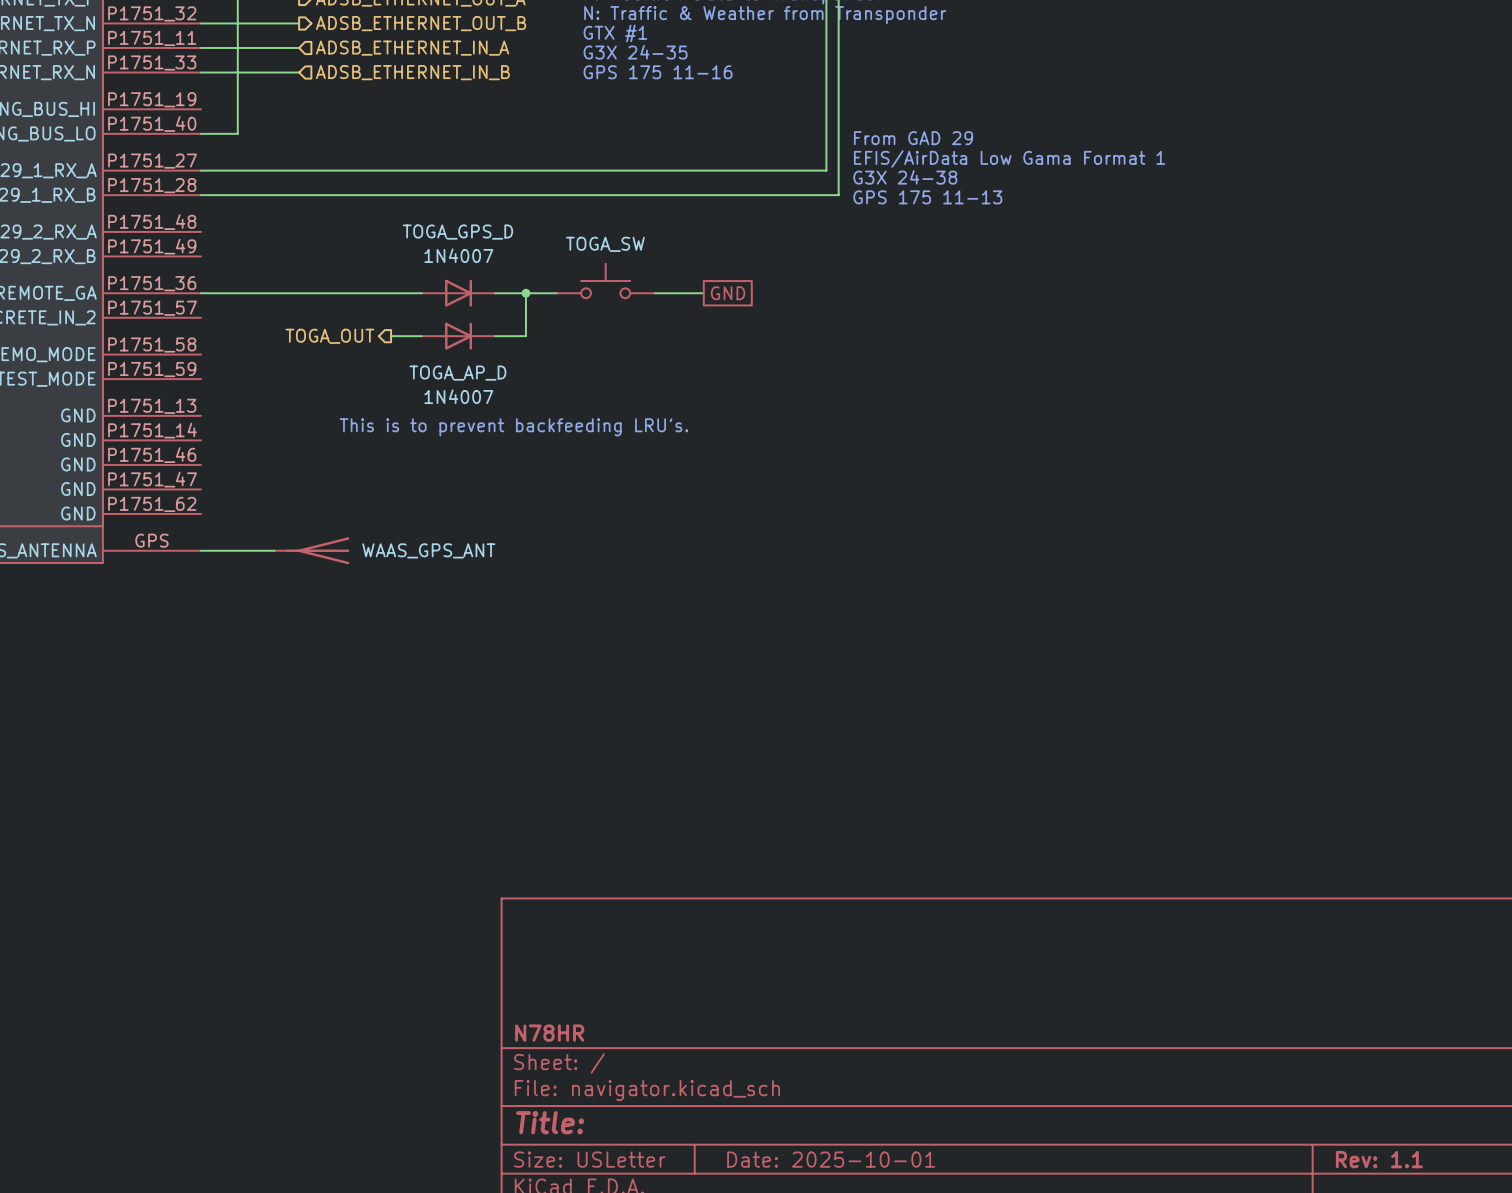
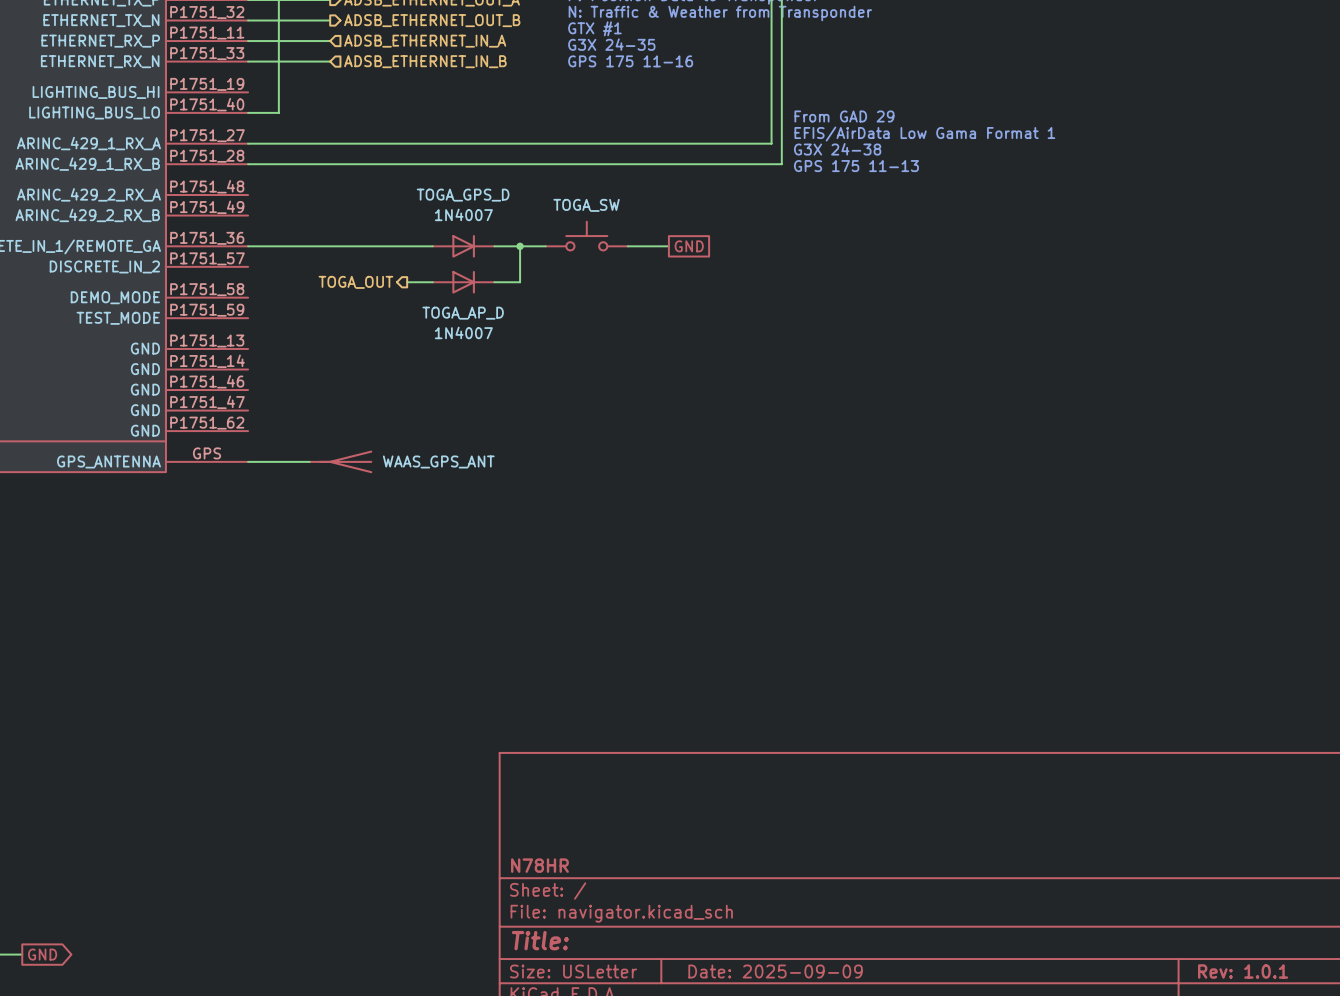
text: This is to prevent backfeeding LRU's. (513, 427) -> none
title block: Date: 2025-10-01 (831, 1159) -> Date: 2025-09-09 (775, 971)
title block: Rev: 1.1 (1379, 1159) -> Rev: 1.0.1 (1243, 971)

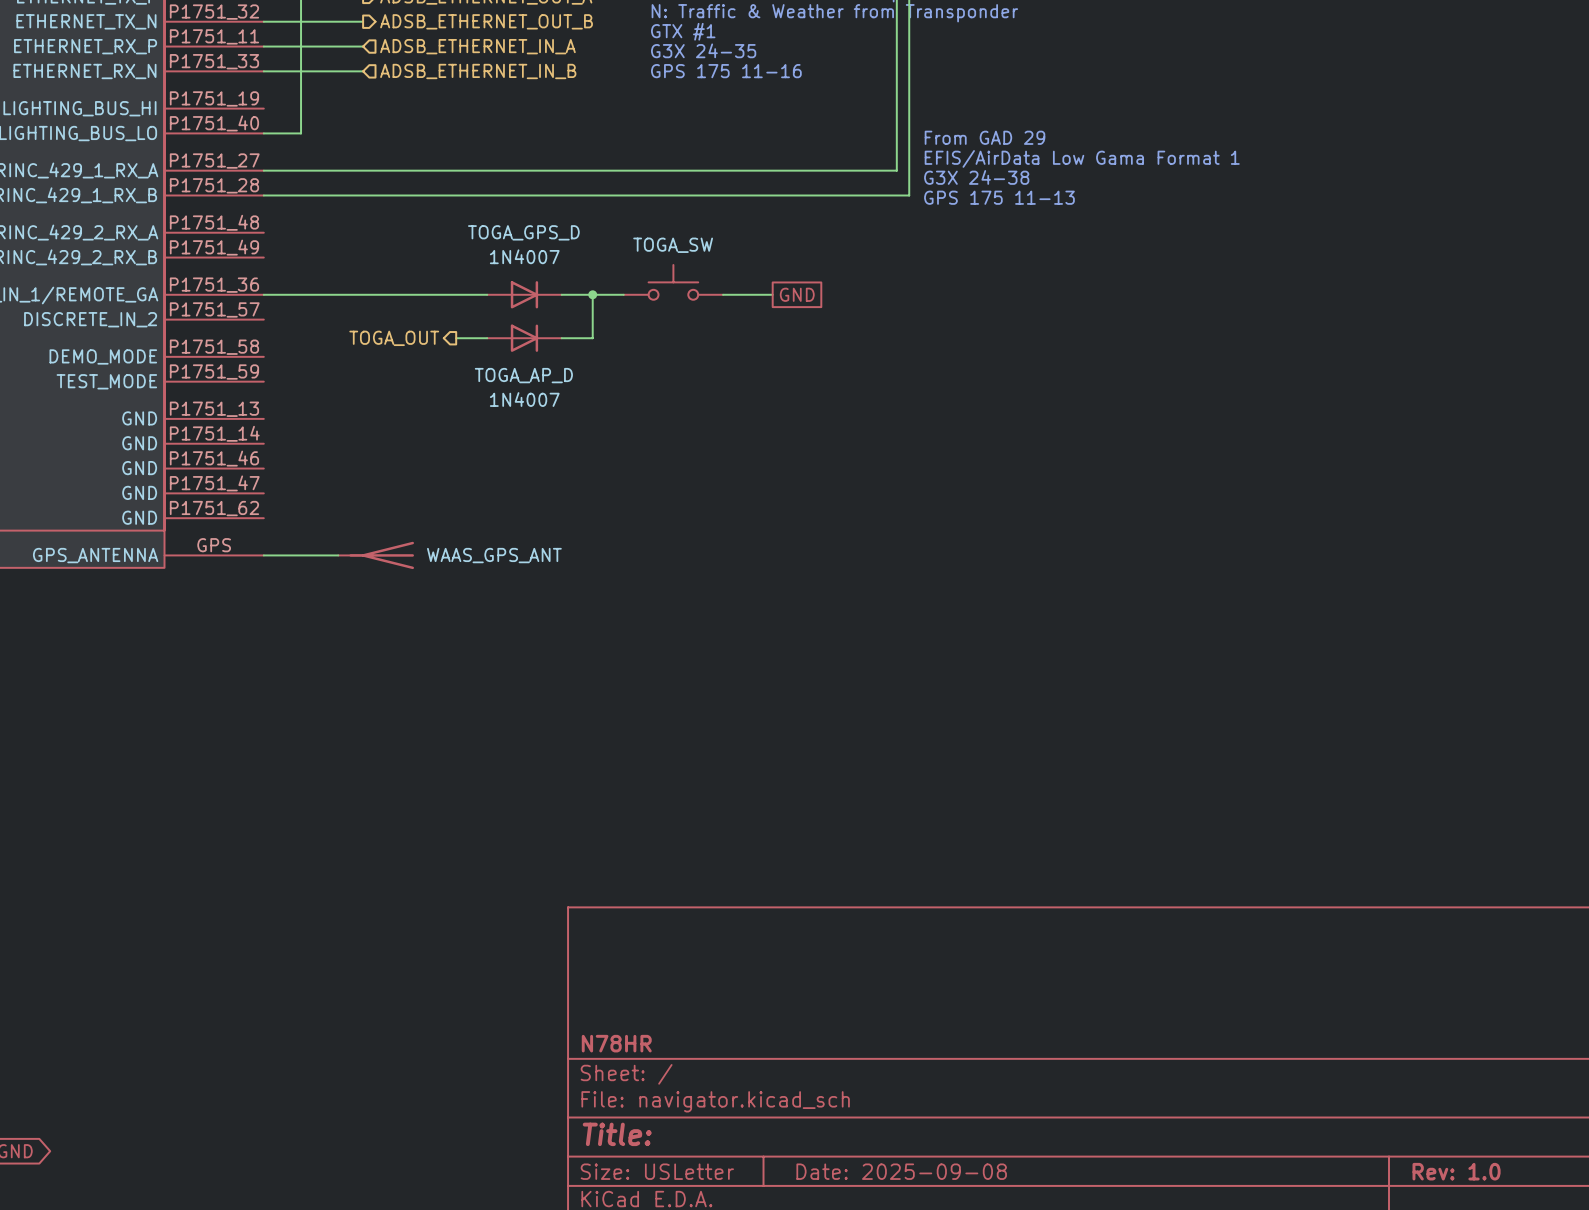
title block: Date: 2025-09-09 (775, 971) -> Date: 2025-09-08 (901, 1171)
title block: Rev: 1.0.1 (1243, 971) -> Rev: 1.0 (1456, 1171)

